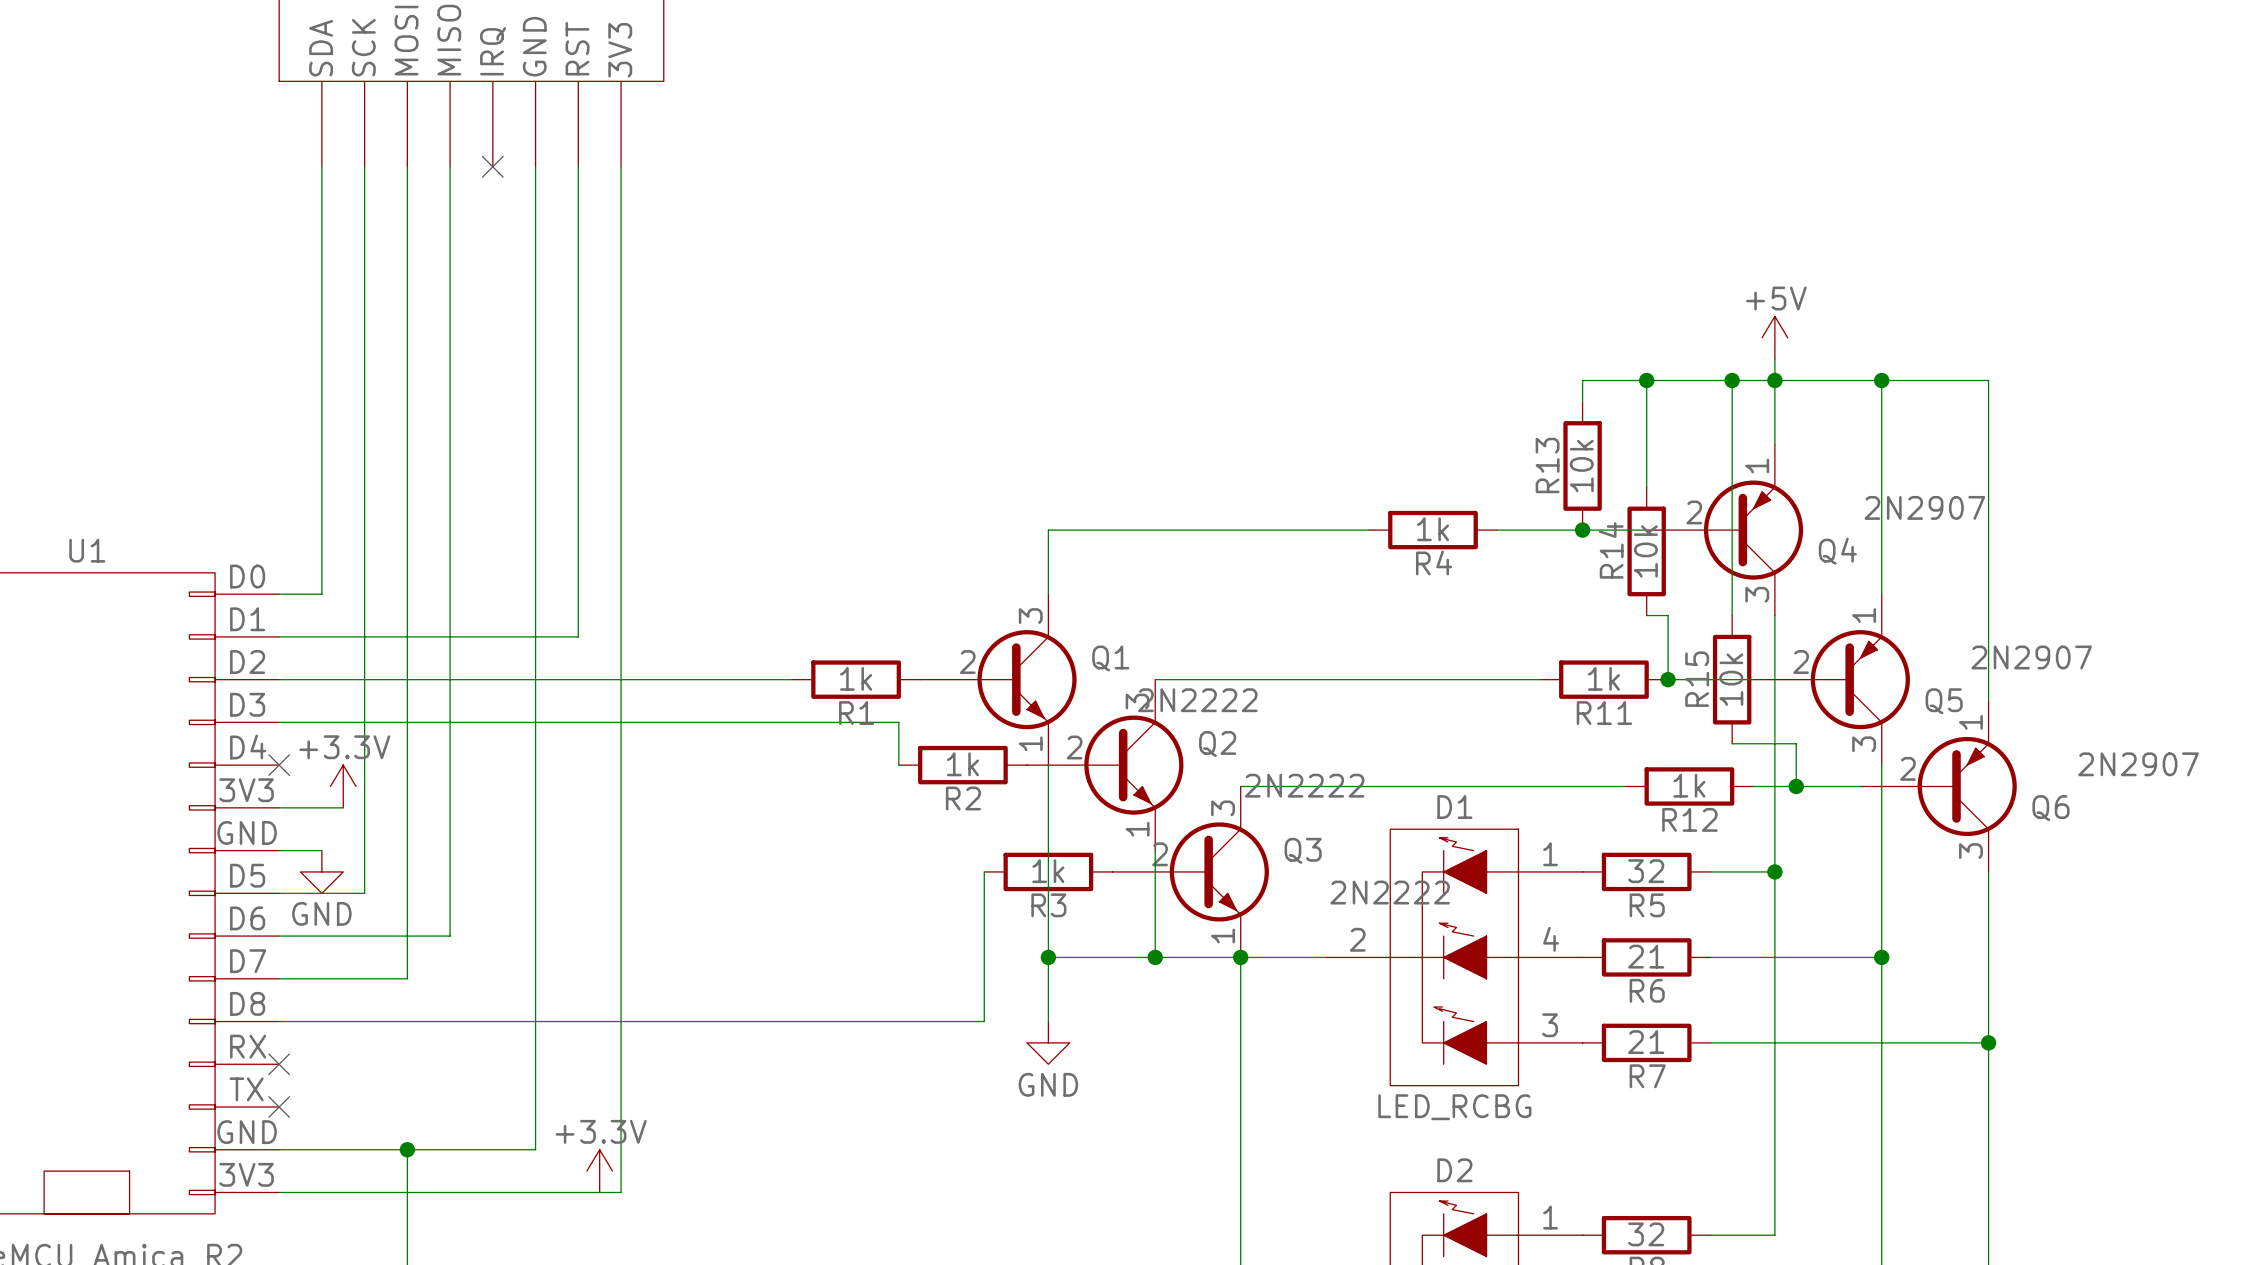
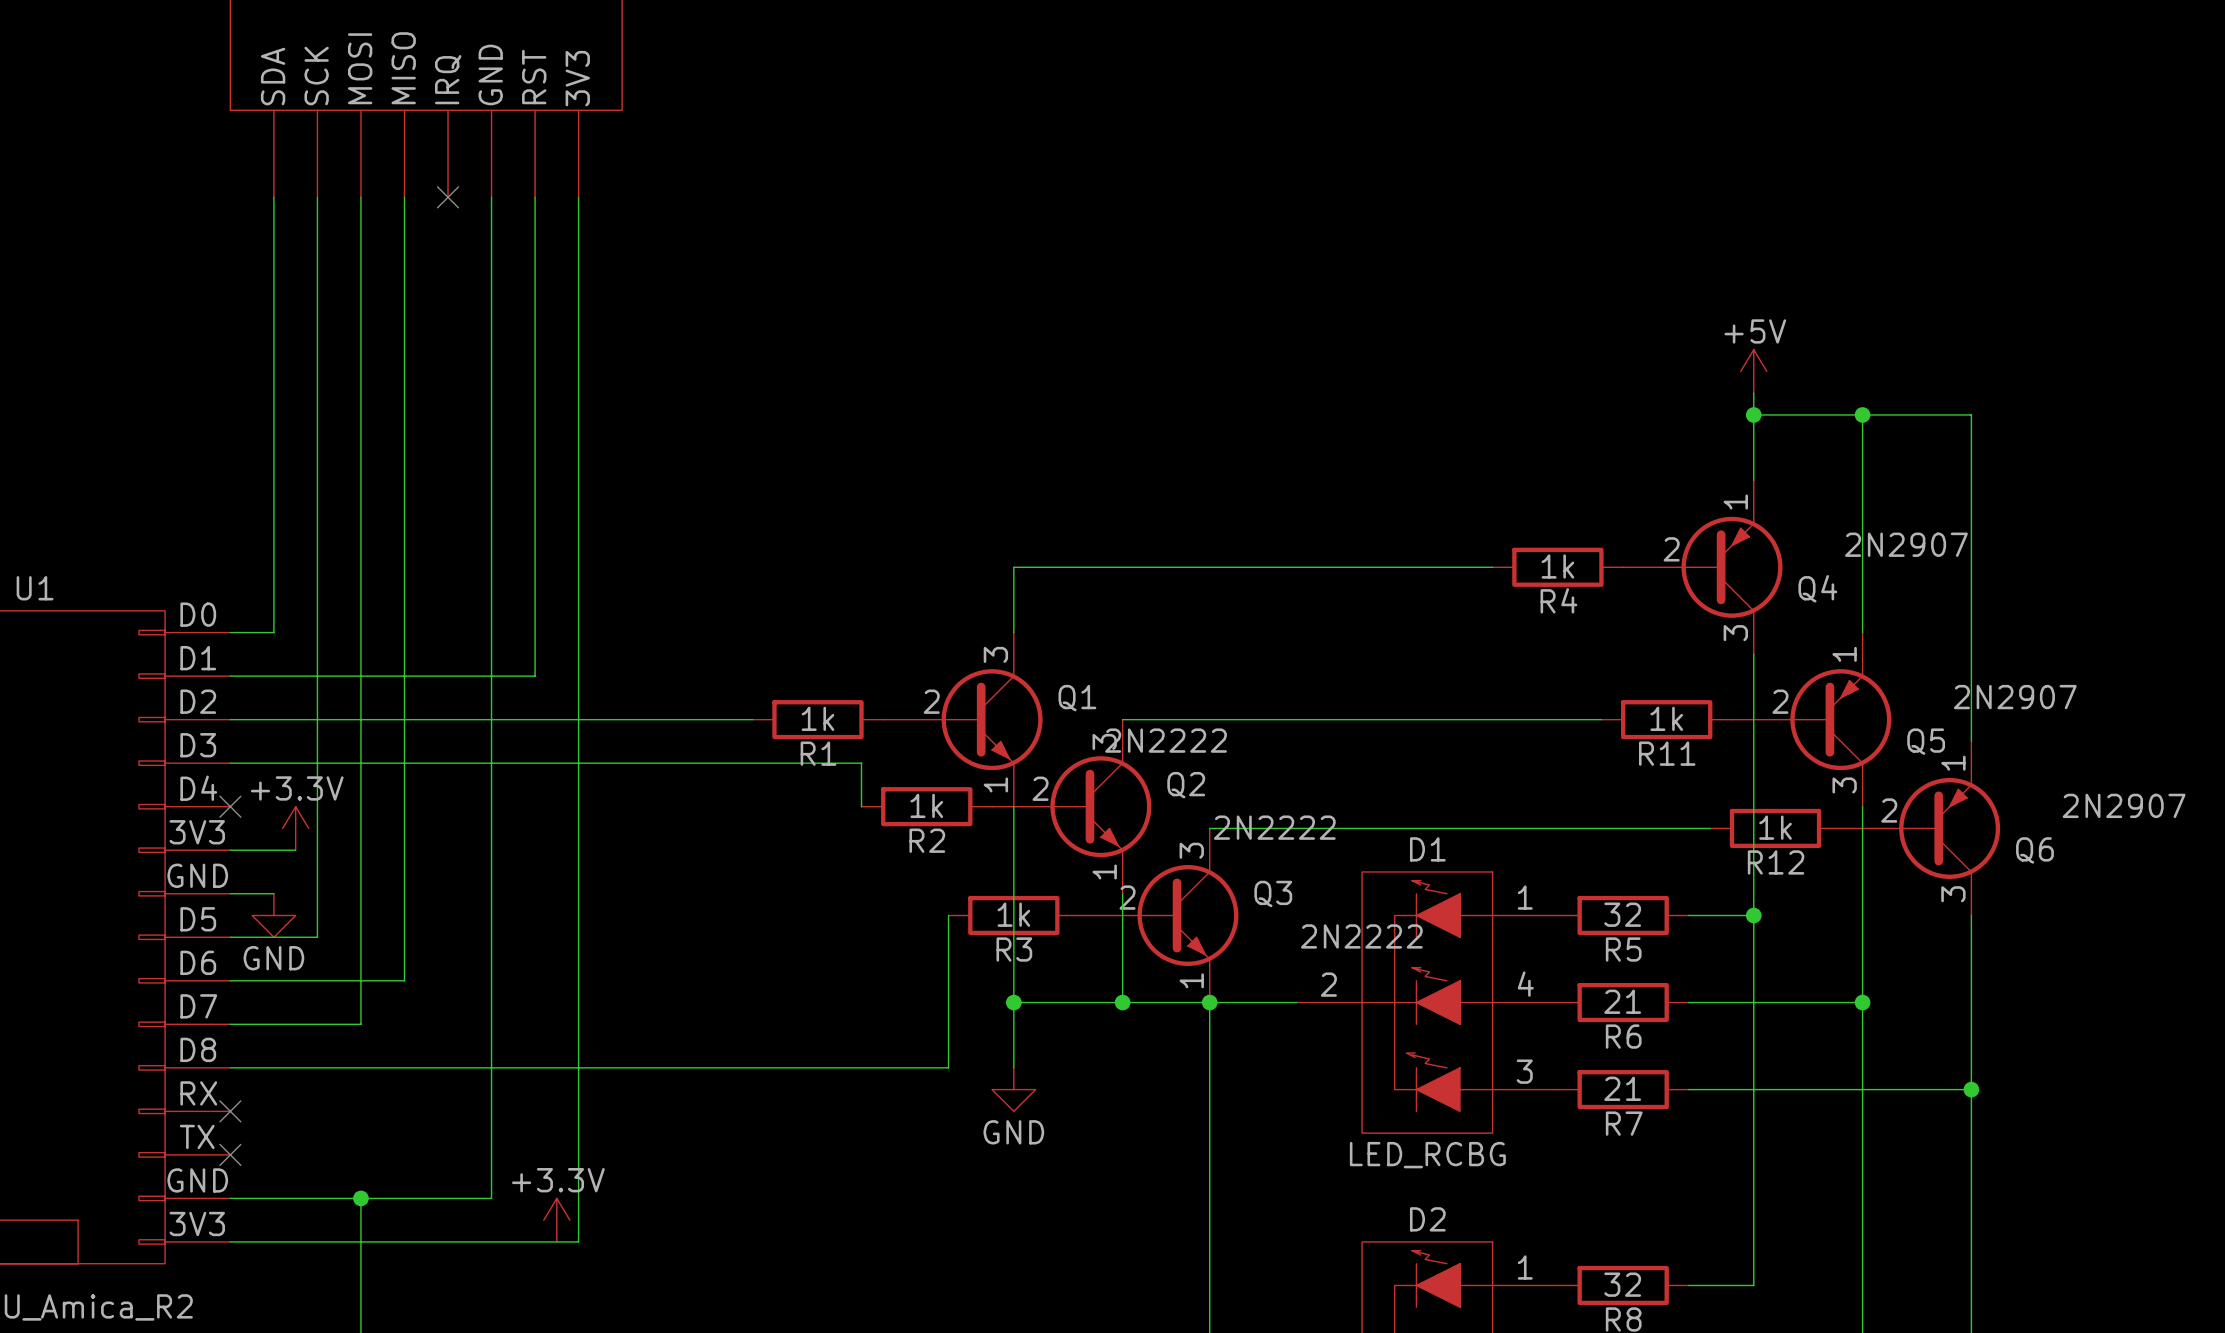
wire: (1646, 380) (1646, 487) -> none
junction: (1646, 380) -> none
wire: (1732, 380) (1732, 615) -> none
junction: (1732, 380) -> none
wire: (1774, 380) (1582, 380) (1582, 401) -> none
R13: 10k (1582, 465) -> none
R4 position: (1433, 530) -> (1557, 567)
wire: (1518, 530) (1646, 530) -> (1340, 567) (1470, 567)
junction: (1582, 530) -> none
R14: 10k (1646, 551) -> none
wire: (1646, 615) (1668, 615) (1668, 679) (1753, 679) -> none
wire: none -> (1514, 719) (1601, 719)
R11 position: (1603, 679) -> (1666, 719)
junction: (1668, 679) -> none
R15: 10k (1732, 679) -> none
wire: (1732, 743) (1796, 743) (1796, 786) -> none
R12 position: (1689, 786) -> (1775, 828)
wire: (1753, 786) (1860, 786) -> (1601, 828) (1710, 828)
junction: (1796, 786) -> none

